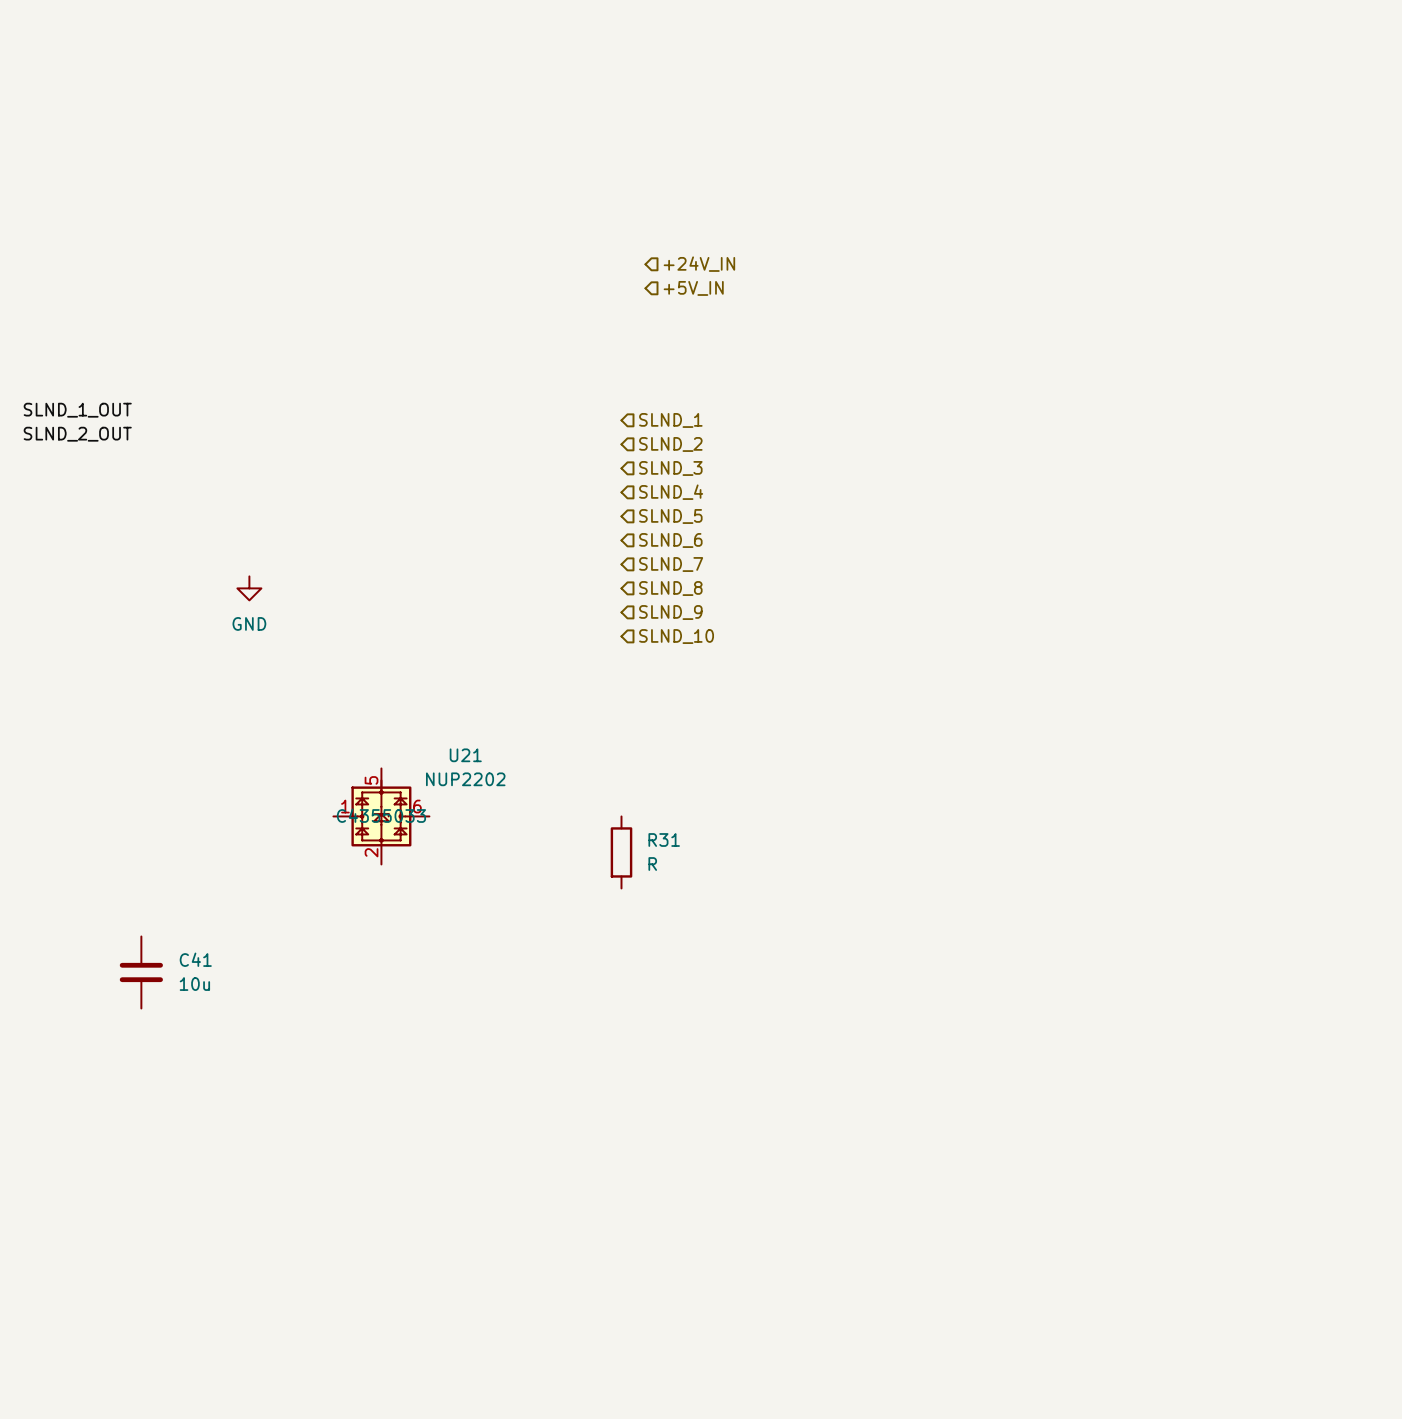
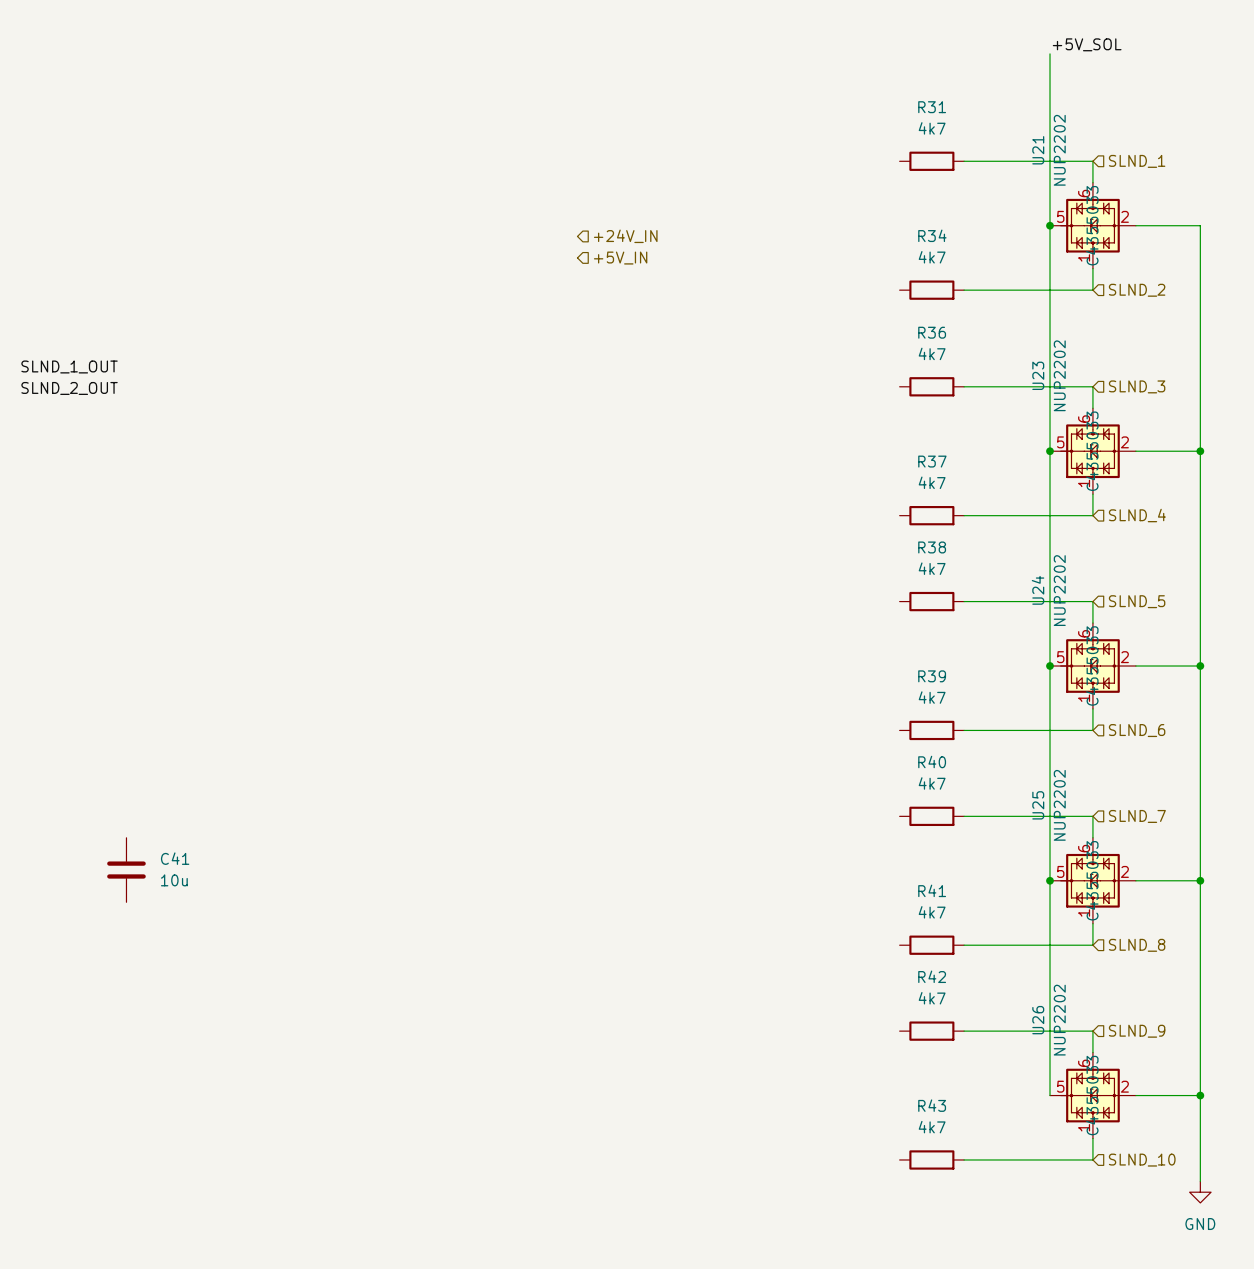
label: none -> +5V_SOL (1087, 44)
wire: none -> (1050, 53) (1050, 1095)
wire: none -> (964, 161) (1092, 161) (1092, 182)
hierarchical label: none -> SLND_1 (1137, 161)
junction: none -> (1050, 225)
wire: none -> (1135, 225) (1200, 225) (1200, 1181)
wire: none -> (1092, 268) (1092, 290) (964, 290)
R34: none -> 4k7 (931, 290)
hierarchical label: none -> SLND_2 (1137, 290)
hierarchical label: SLND_1 (670, 420) -> none
R36: none -> 4k7 (931, 386)
wire: none -> (964, 386) (1092, 386) (1092, 408)
hierarchical label: none -> SLND_3 (1137, 386)
hierarchical label: SLND_2 (670, 444) -> none
hierarchical label: SLND_3 (670, 468) -> none
hierarchical label: SLND_4 (671, 492) -> none
junction: none -> (1050, 451)
U23: none -> NUP2202 (1092, 451)
wire: none -> (1135, 451) (1200, 451)
junction: none -> (1200, 451)
hierarchical label: SLND_5 (670, 516) -> none
hierarchical label: SLND_6 (670, 540) -> none
wire: none -> (1092, 494) (1092, 515) (964, 515)
hierarchical label: SLND_7 (671, 564) -> none
R37: none -> 4k7 (931, 515)
hierarchical label: none -> SLND_4 (1137, 515)
power symbol: GND (249, 588) -> none
hierarchical label: SLND_8 (670, 588) -> none
hierarchical label: SLND_9 (670, 612) -> none
hierarchical label: SLND_10 (676, 636) -> none
R38: none -> 4k7 (931, 601)
wire: none -> (964, 601) (1092, 601) (1092, 623)
hierarchical label: none -> SLND_5 (1137, 601)
junction: none -> (1050, 666)
U24: none -> NUP2202 (1092, 666)
wire: none -> (1135, 666) (1200, 666)
junction: none -> (1200, 666)
wire: none -> (1092, 708) (1092, 730) (964, 730)
U21 rotation: 0° (381, 813) -> 90° counterclockwise (1090, 225)
U21 position: (381, 816) -> (1092, 225)
R39: none -> 4k7 (931, 730)
hierarchical label: none -> SLND_6 (1137, 730)
R31 name position: R31 (664, 840) -> R31 (932, 107)
R31 rotation: 0° (621, 852) -> 90° clockwise (931, 161)
R31 position: (621, 852) -> (931, 161)
R31 value: R (652, 864) -> 4k7 (932, 128)
R40: none -> 4k7 (931, 816)
wire: none -> (964, 816) (1092, 816) (1092, 837)
hierarchical label: none -> SLND_7 (1137, 816)
junction: none -> (1050, 880)
U25: none -> NUP2202 (1092, 880)
wire: none -> (1135, 880) (1200, 880)
junction: none -> (1200, 880)
wire: none -> (1092, 923) (1092, 945) (964, 945)
R41: none -> 4k7 (931, 945)
hierarchical label: none -> SLND_8 (1137, 945)
R42: none -> 4k7 (931, 1031)
wire: none -> (964, 1031) (1092, 1031) (1092, 1052)
hierarchical label: none -> SLND_9 (1137, 1031)
U26: none -> NUP2202 (1092, 1095)
wire: none -> (1135, 1095) (1200, 1095)
junction: none -> (1200, 1095)
wire: none -> (1092, 1138) (1092, 1159) (964, 1159)
R43: none -> 4k7 (931, 1159)
hierarchical label: none -> SLND_10 (1142, 1160)
power symbol: none -> GND (1200, 1192)

